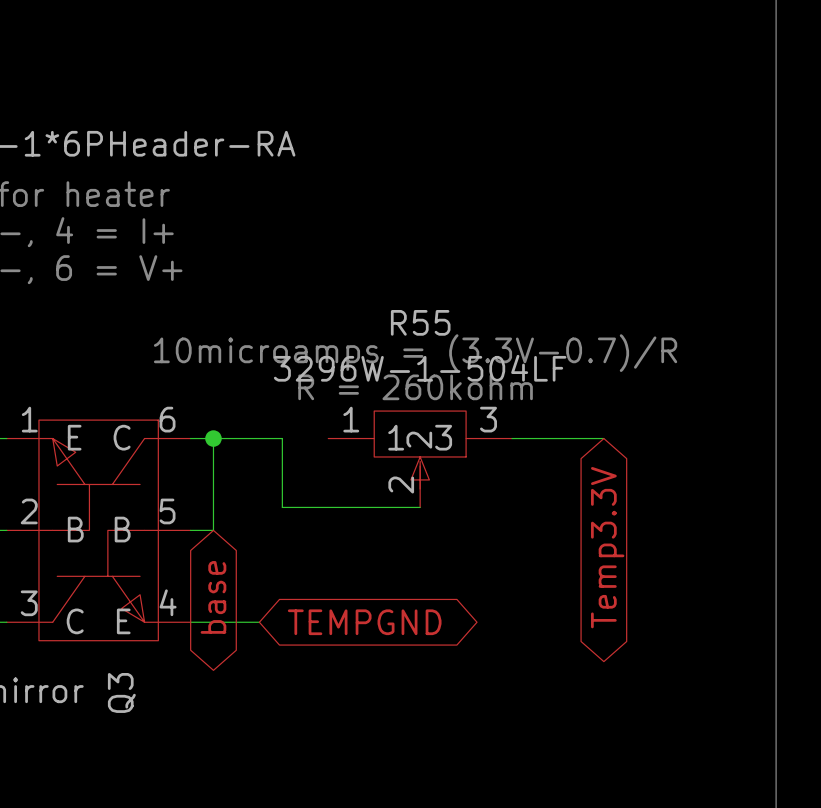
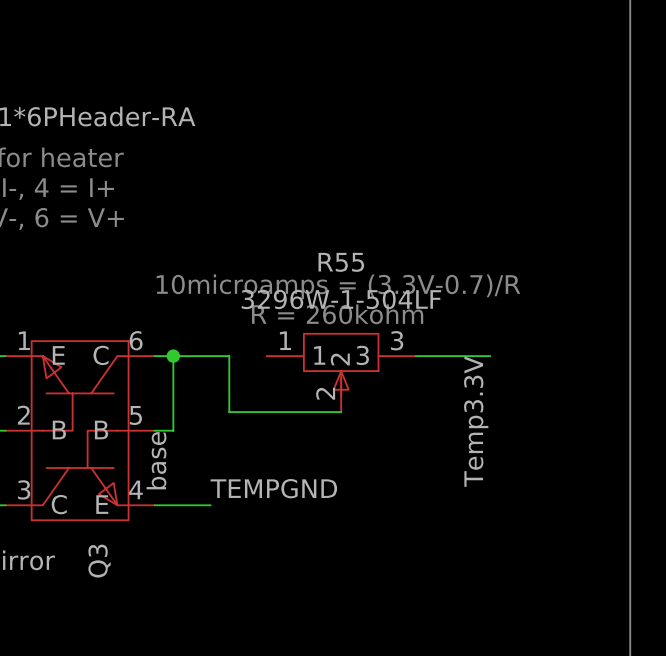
label: none -> Temp3.3V (476, 421)
global label: Temp3.3V (607, 547) -> none
label: none -> base (156, 460)
global label: base (213, 597) -> none
label: none -> TEMPGND (273, 488)
global label: TEMPGND (364, 622) -> none

